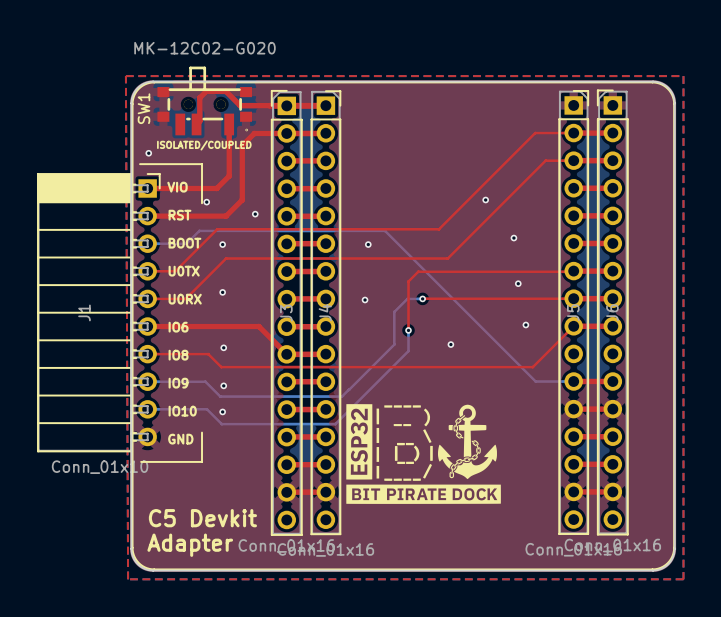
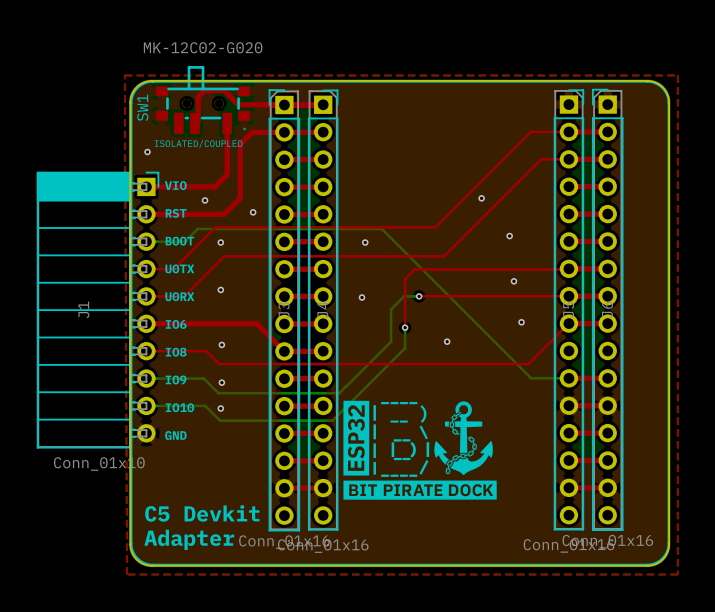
line: (140, 164) (202, 164) (202, 203) -> none
line: (202, 432) (202, 461) (141, 461) -> none

